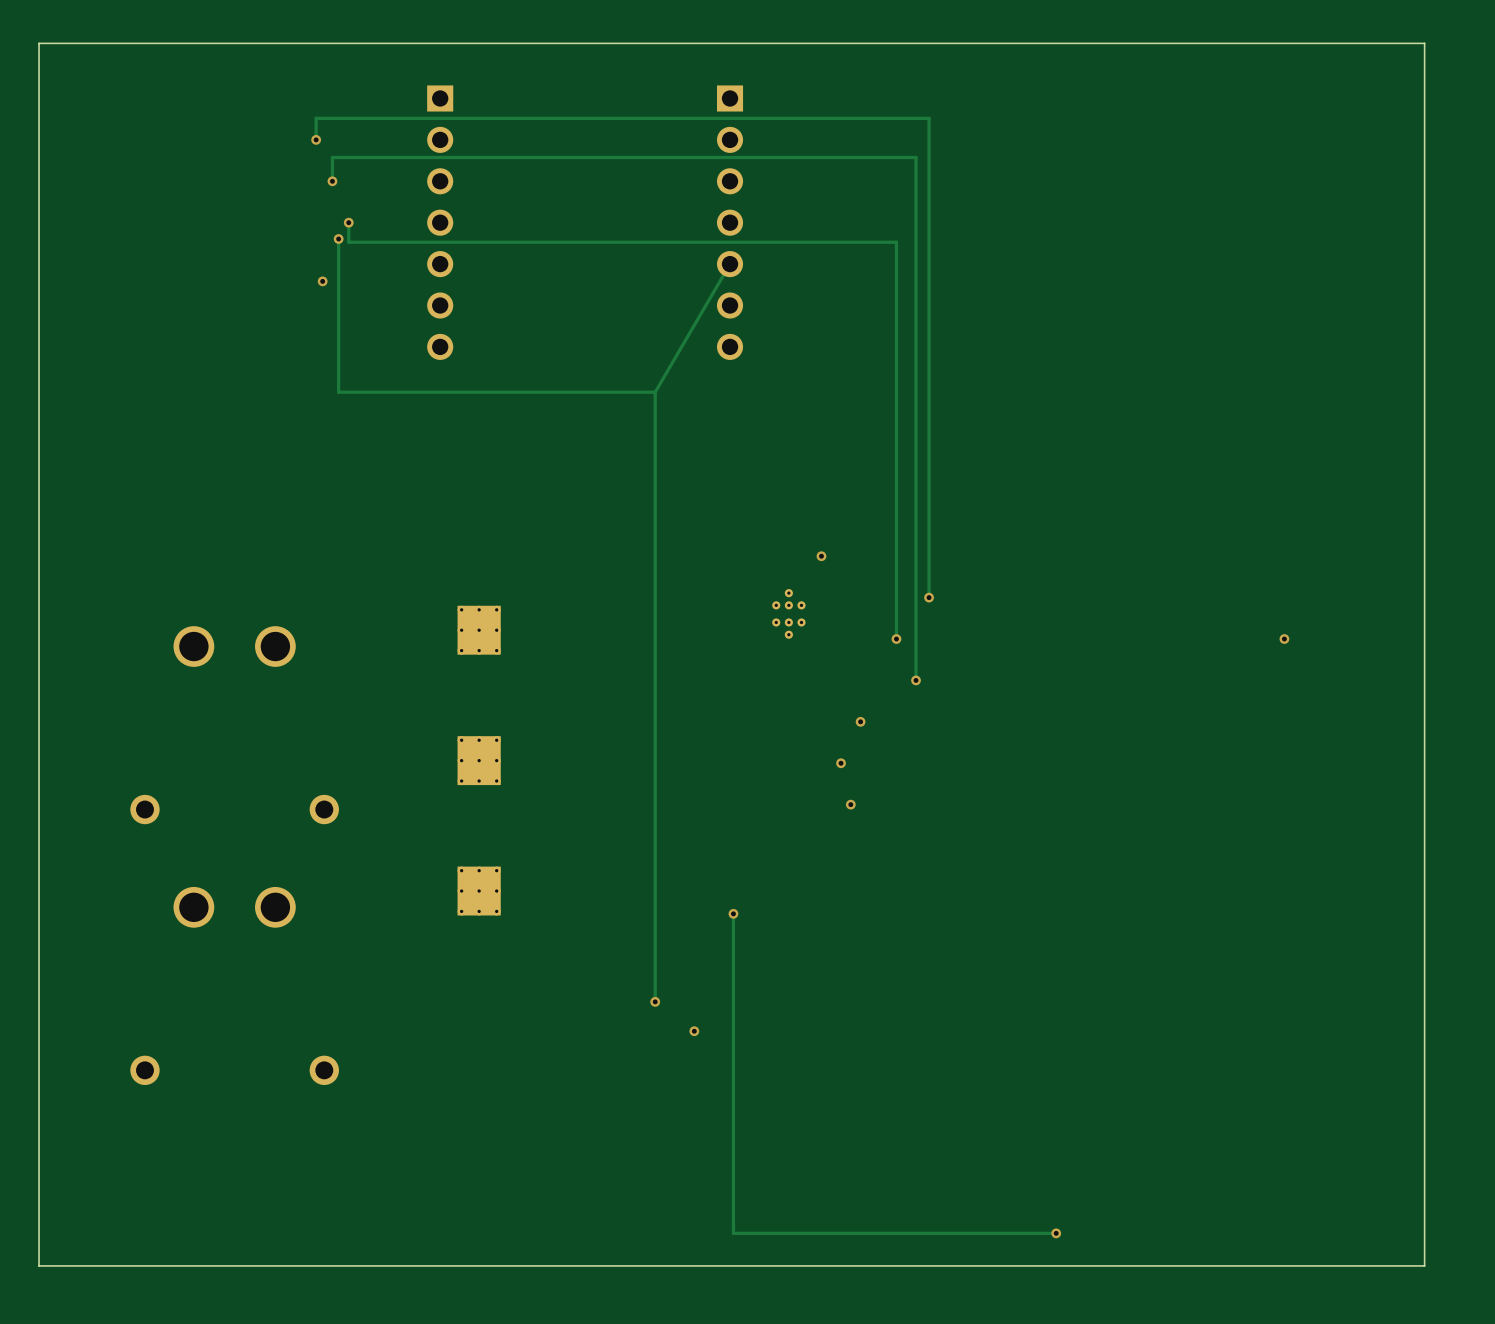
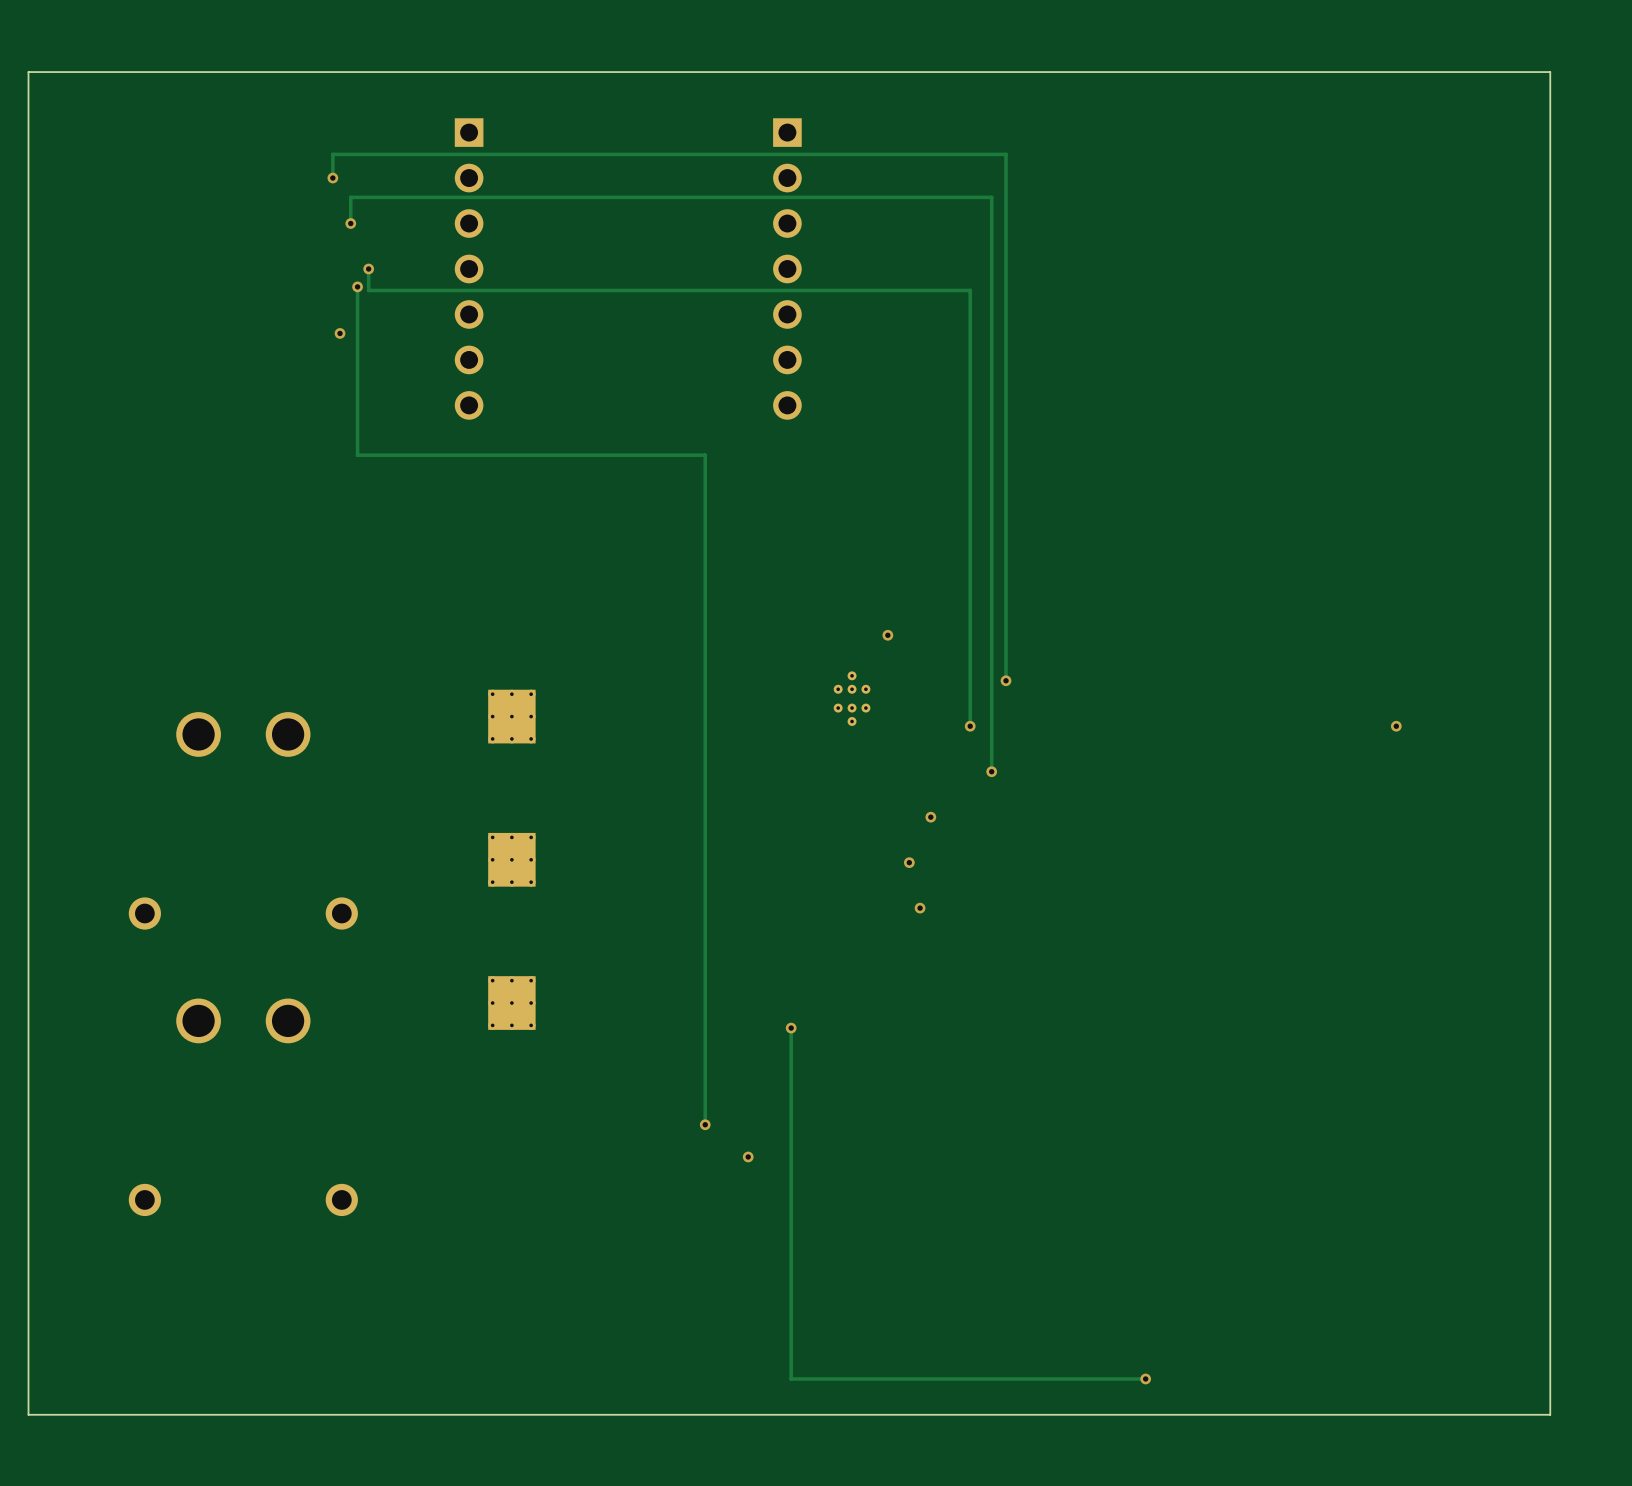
track: (730, 264) (655, 392) -> none

